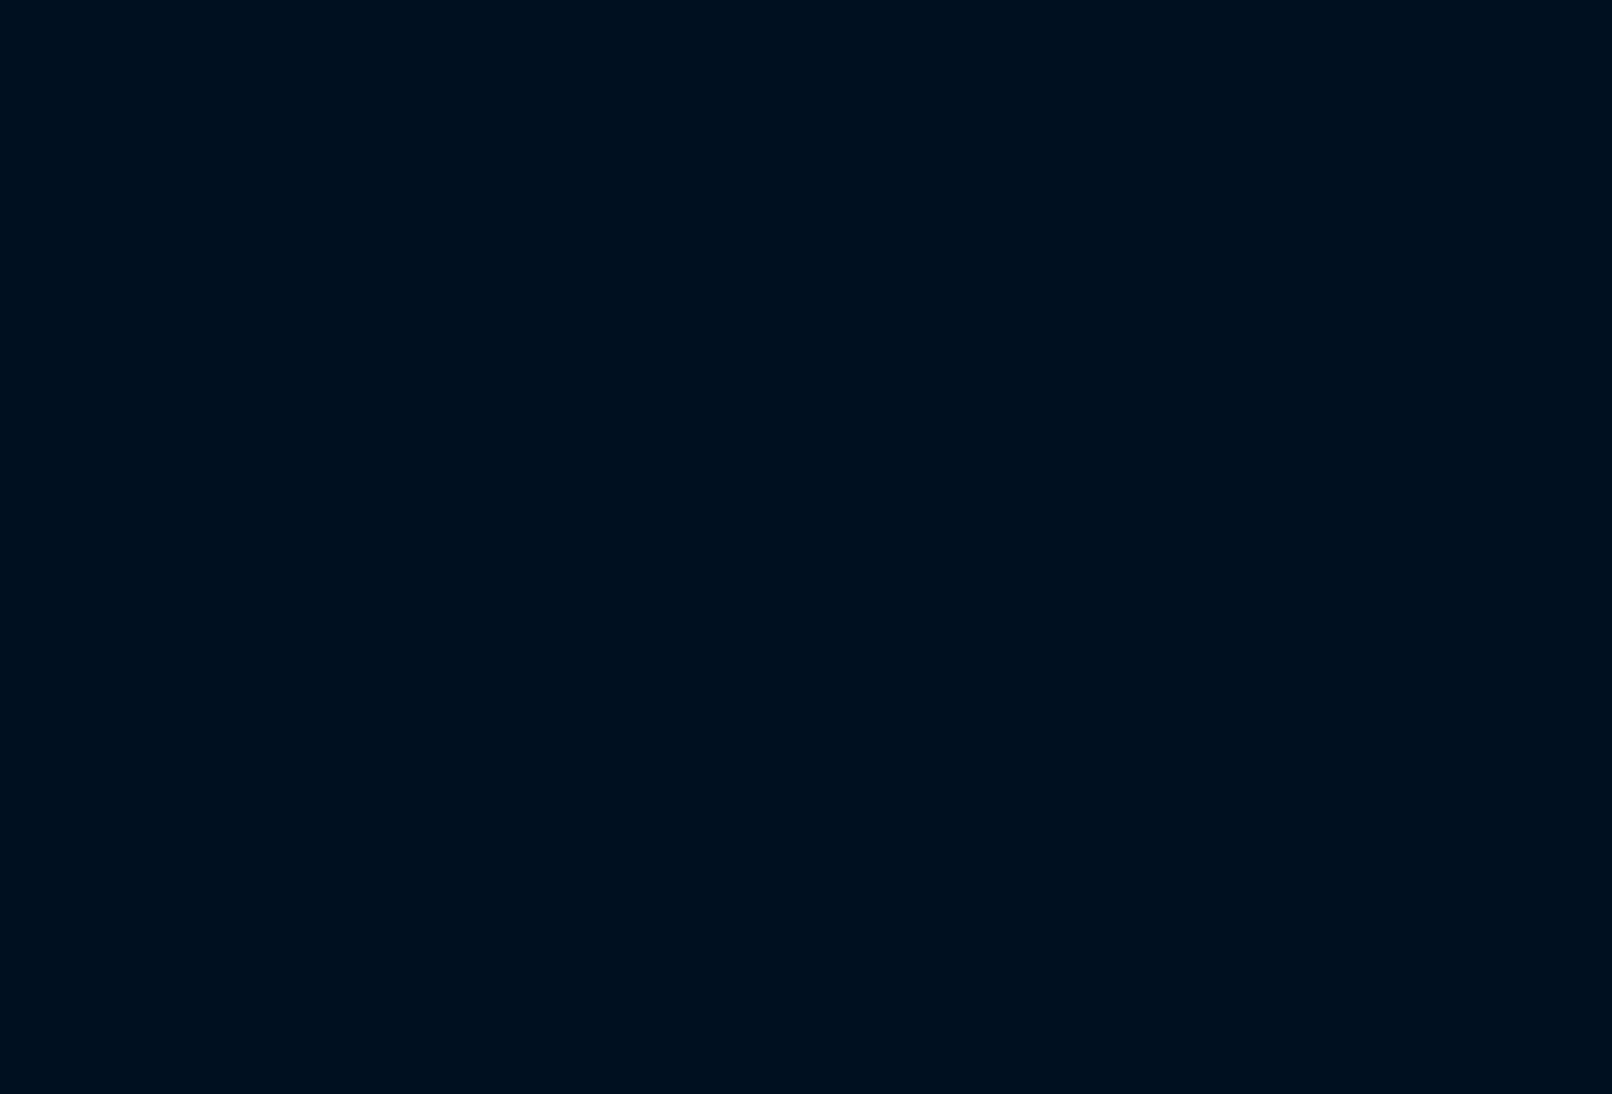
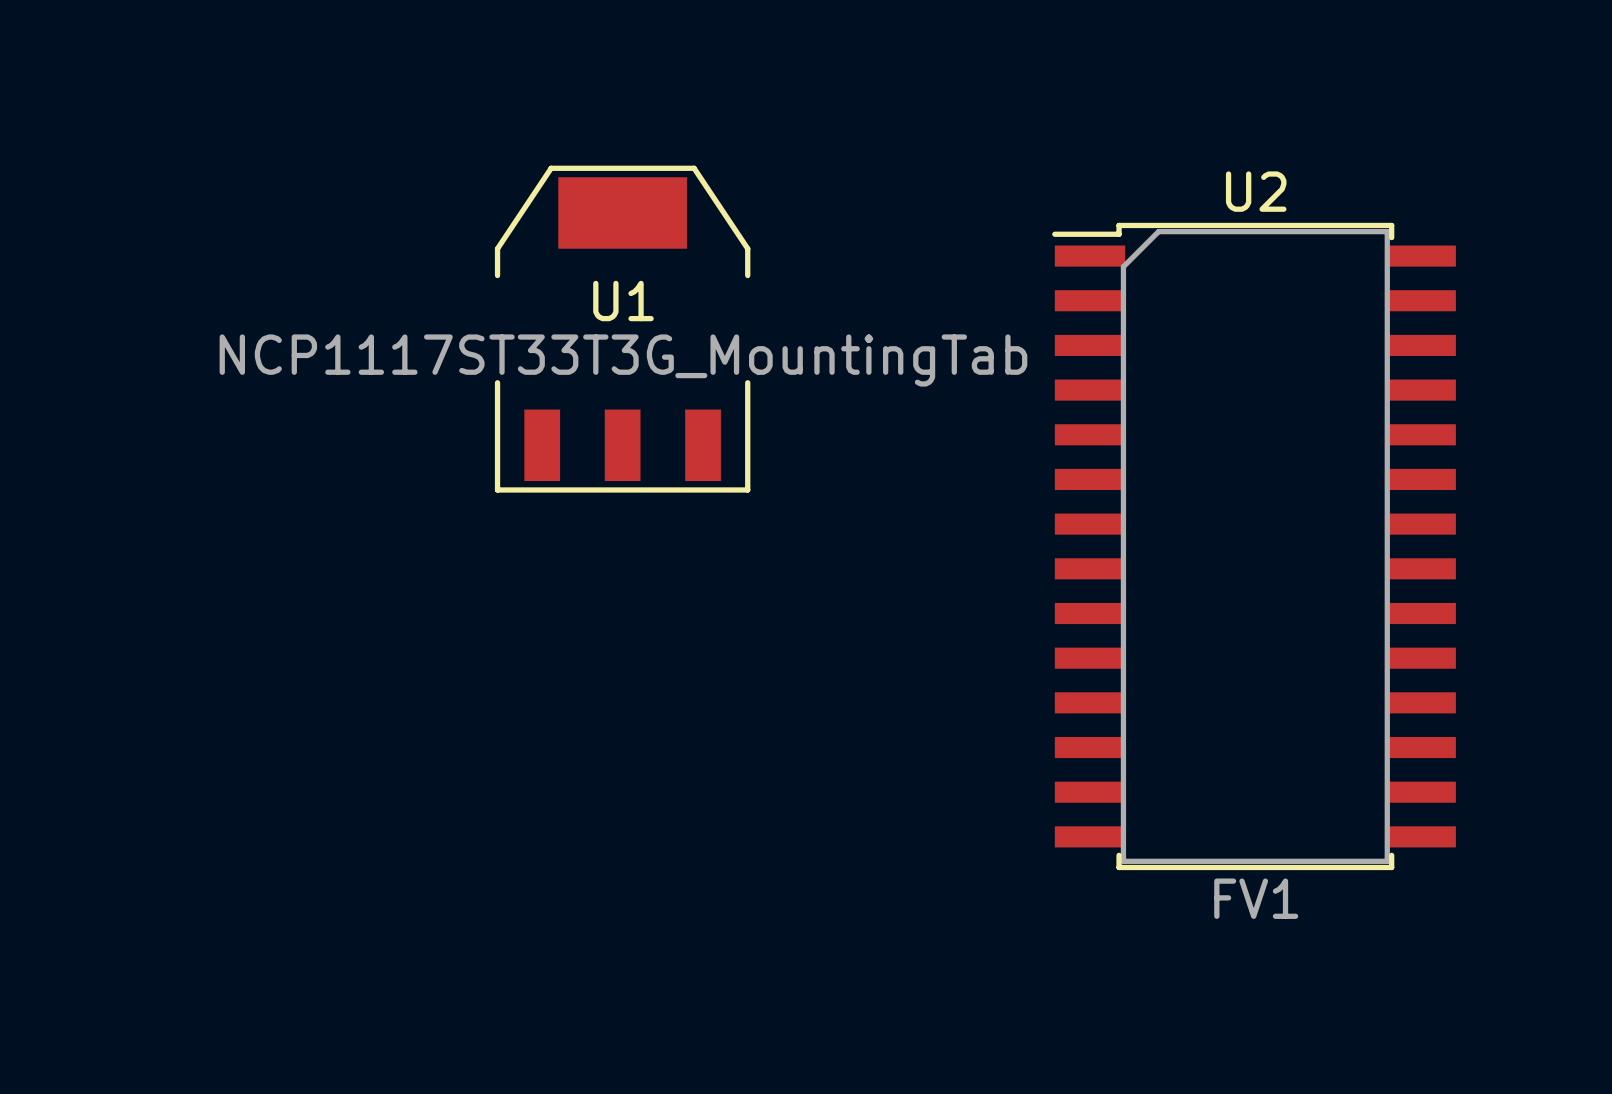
U1: none -> NCP1117ST33T3G_MountingTab (622, 329)
U2: none -> FV1 (1254, 546)

